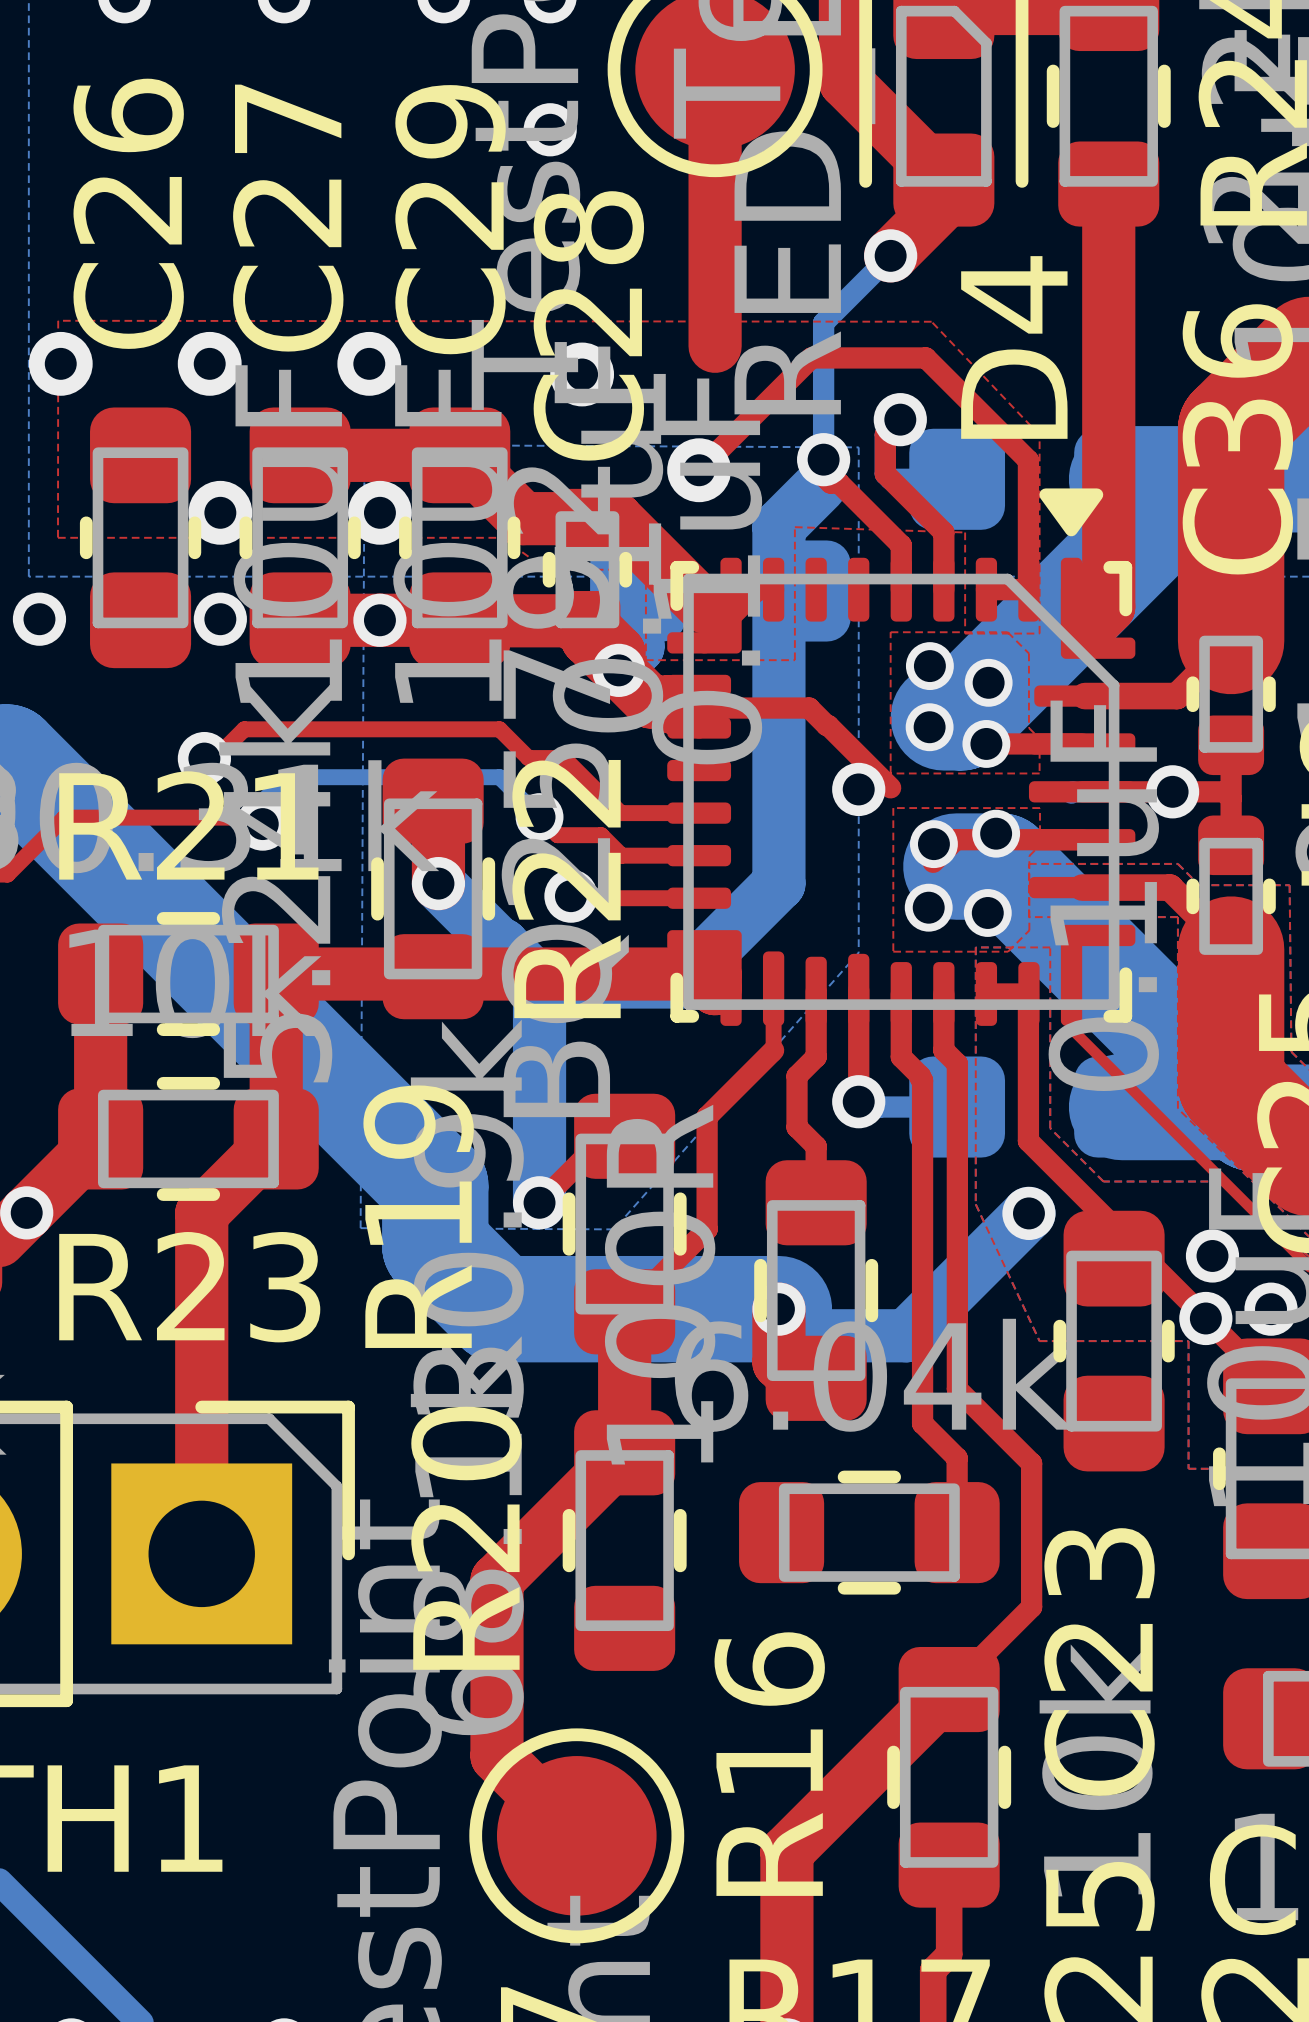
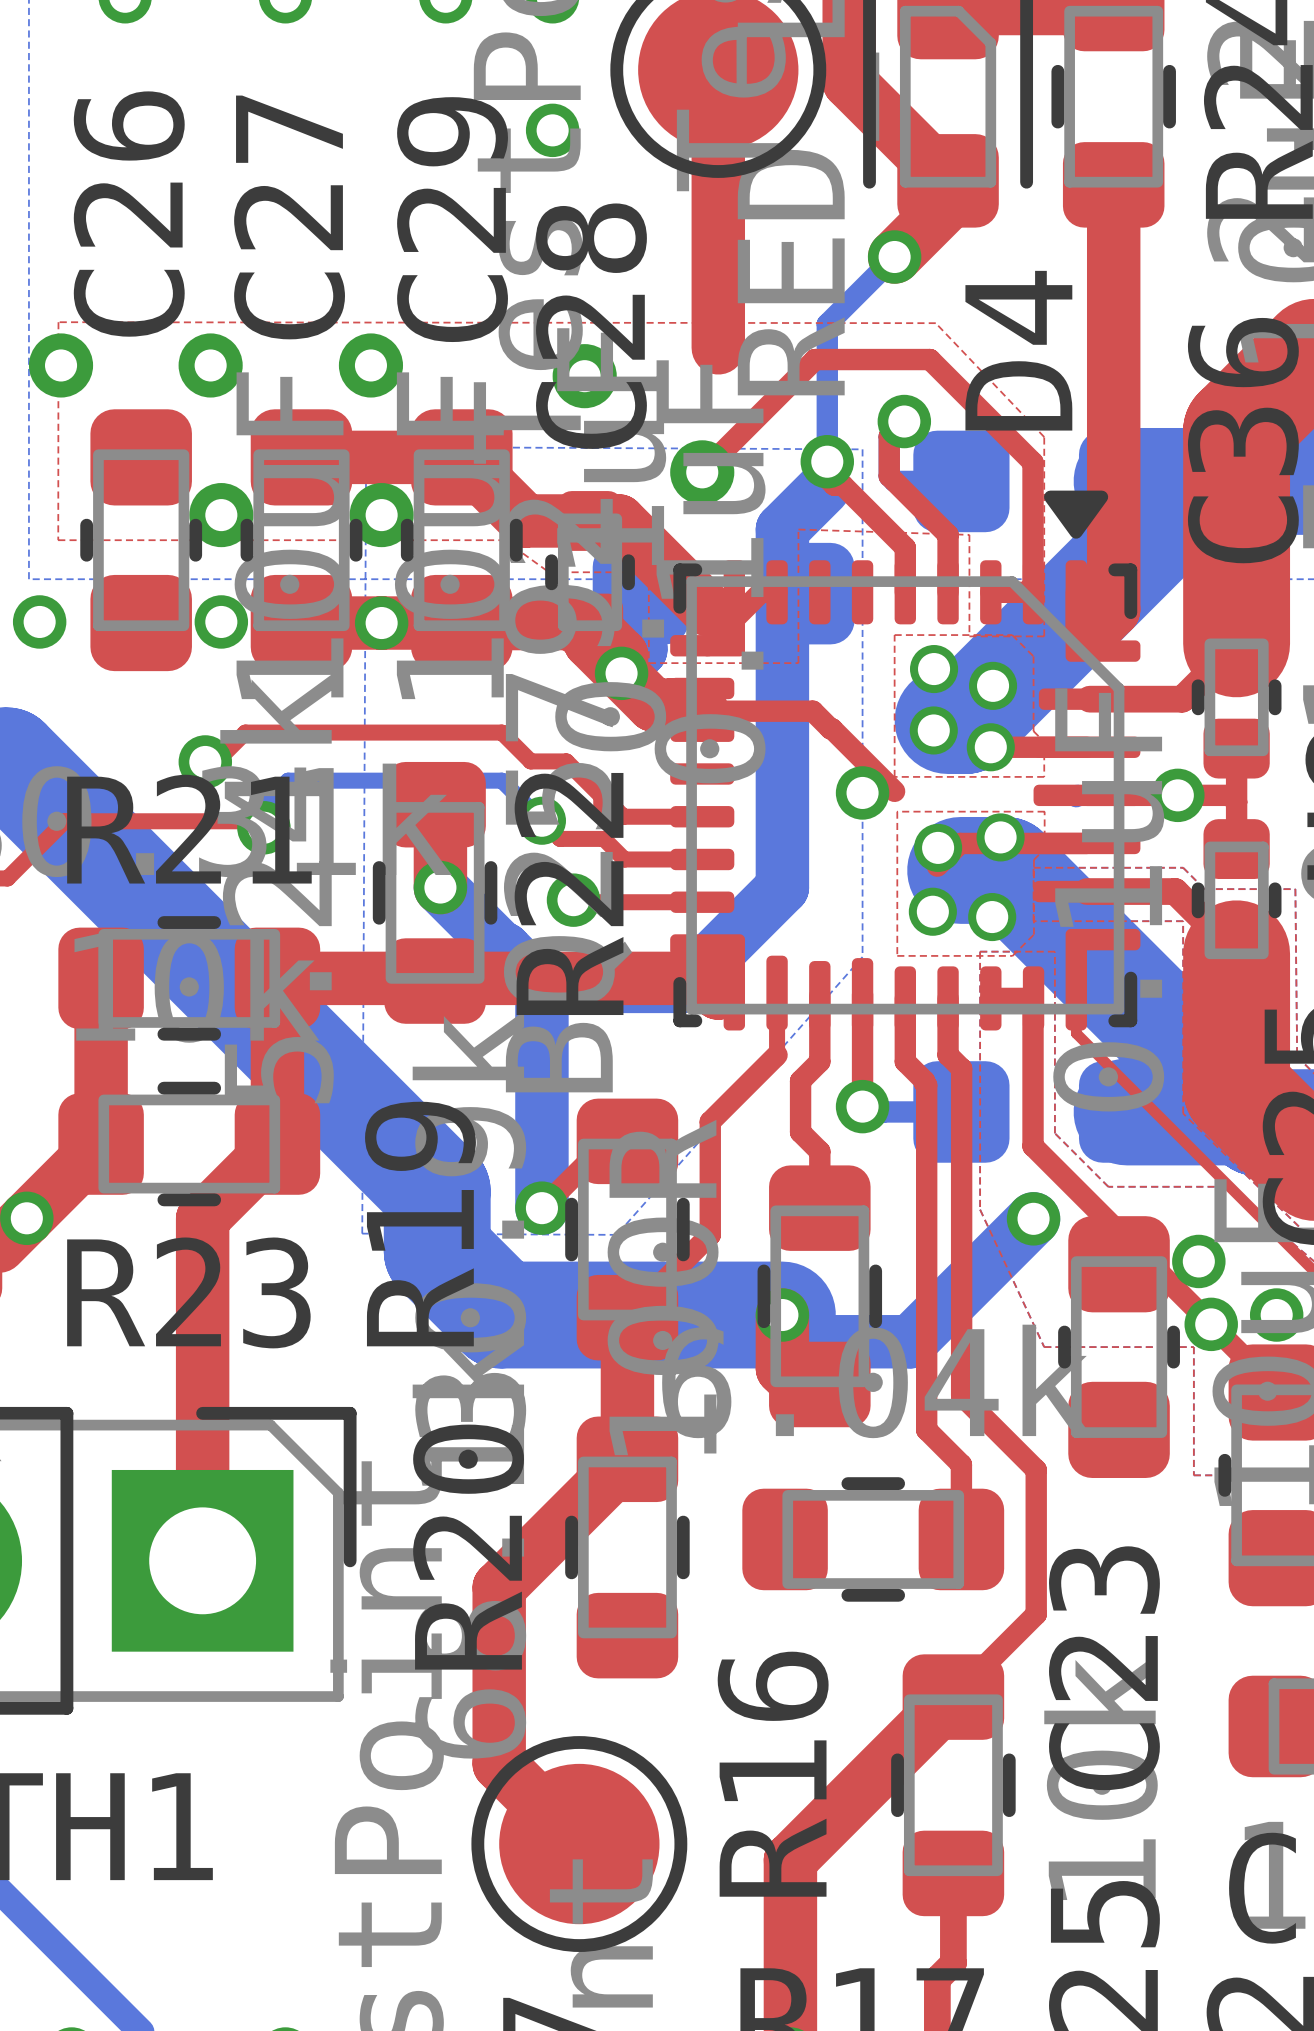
via position: (1212, 1255) -> (1198, 1261)

